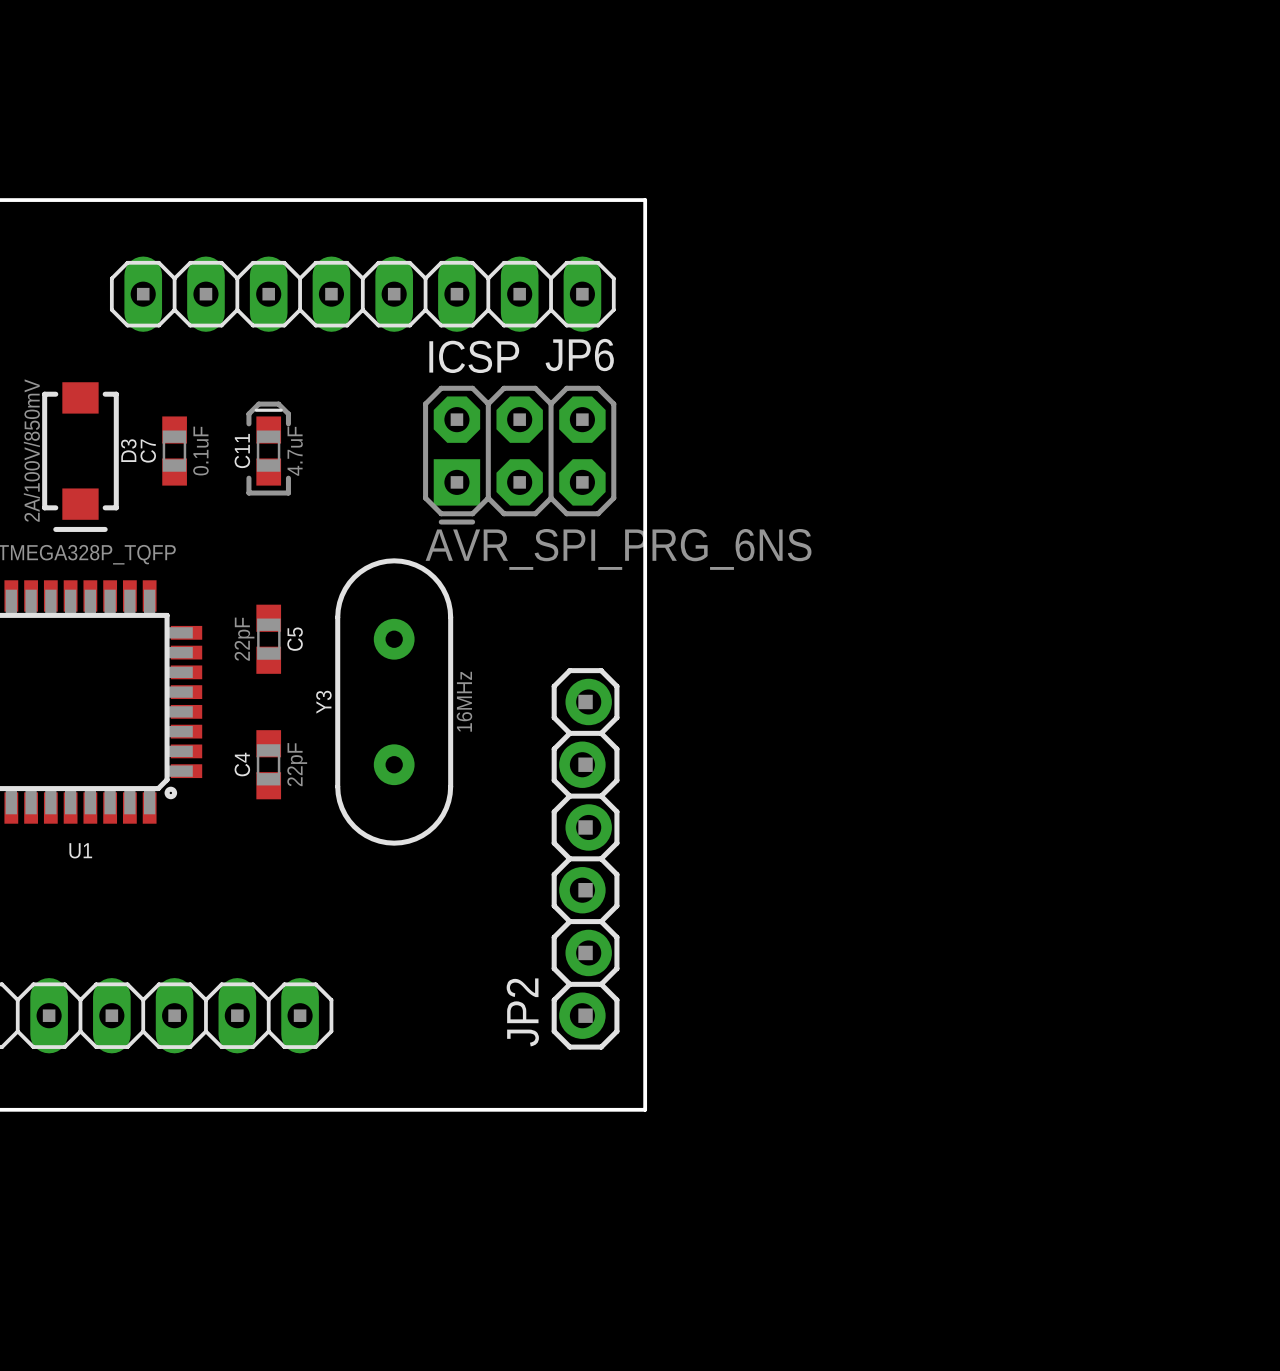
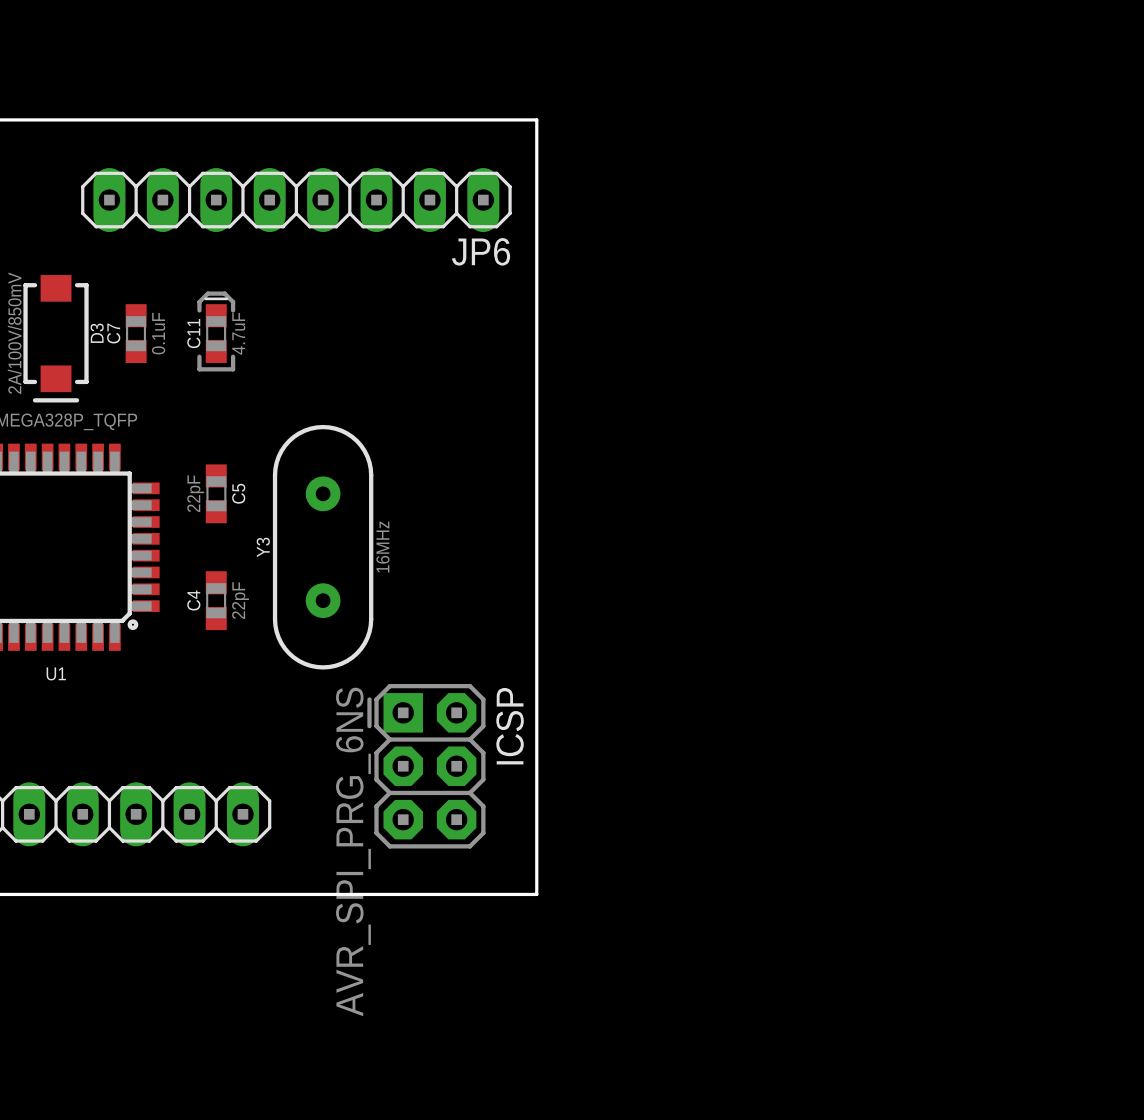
ICSP rotation: 0° (519, 455) -> 90° clockwise (426, 766)
ICSP position: (519, 455) -> (426, 766)
JP2: (585, 858) -> none

